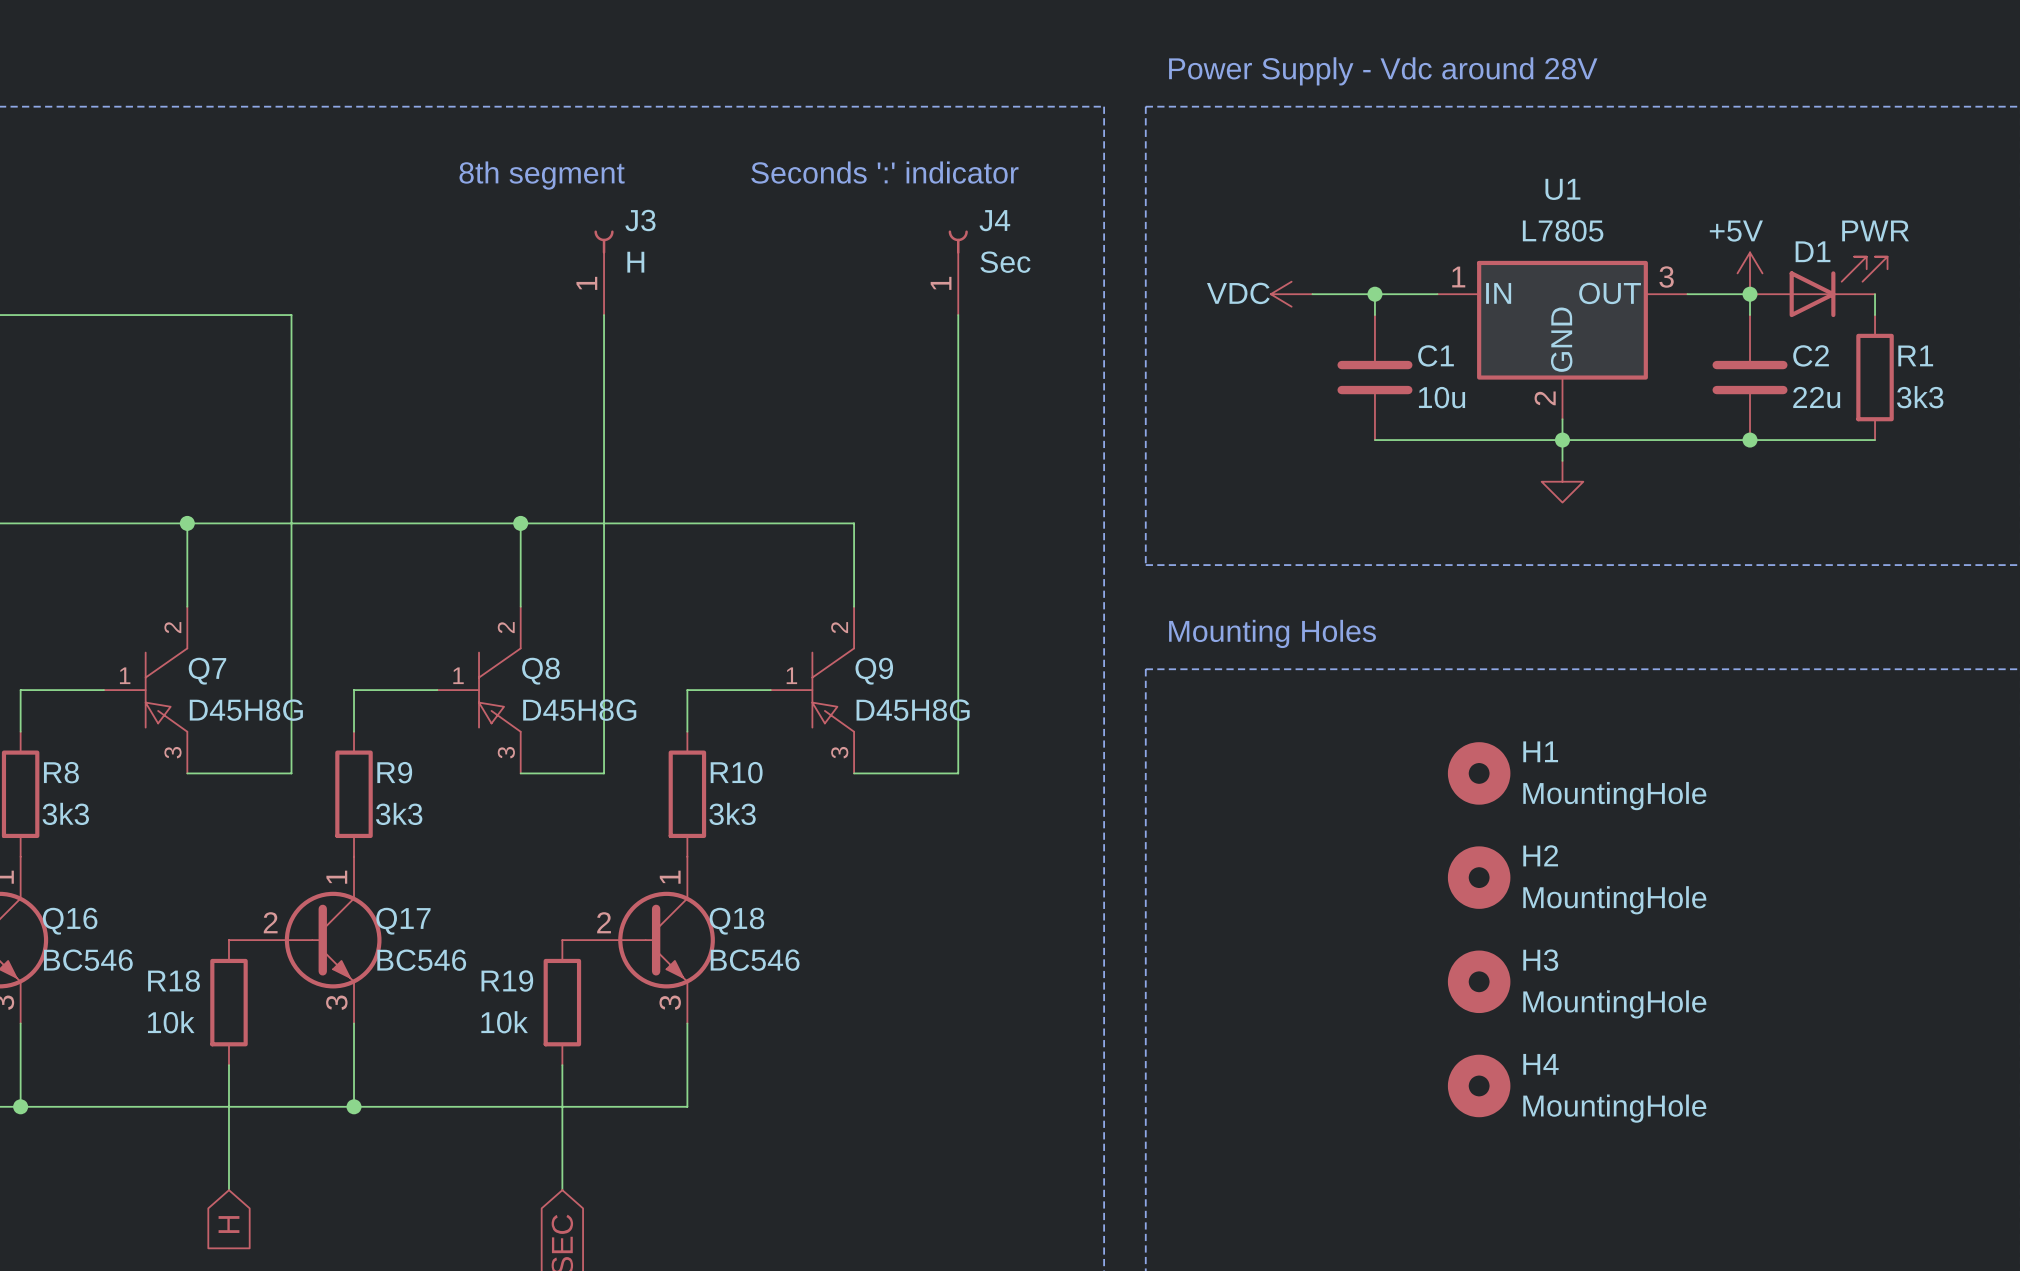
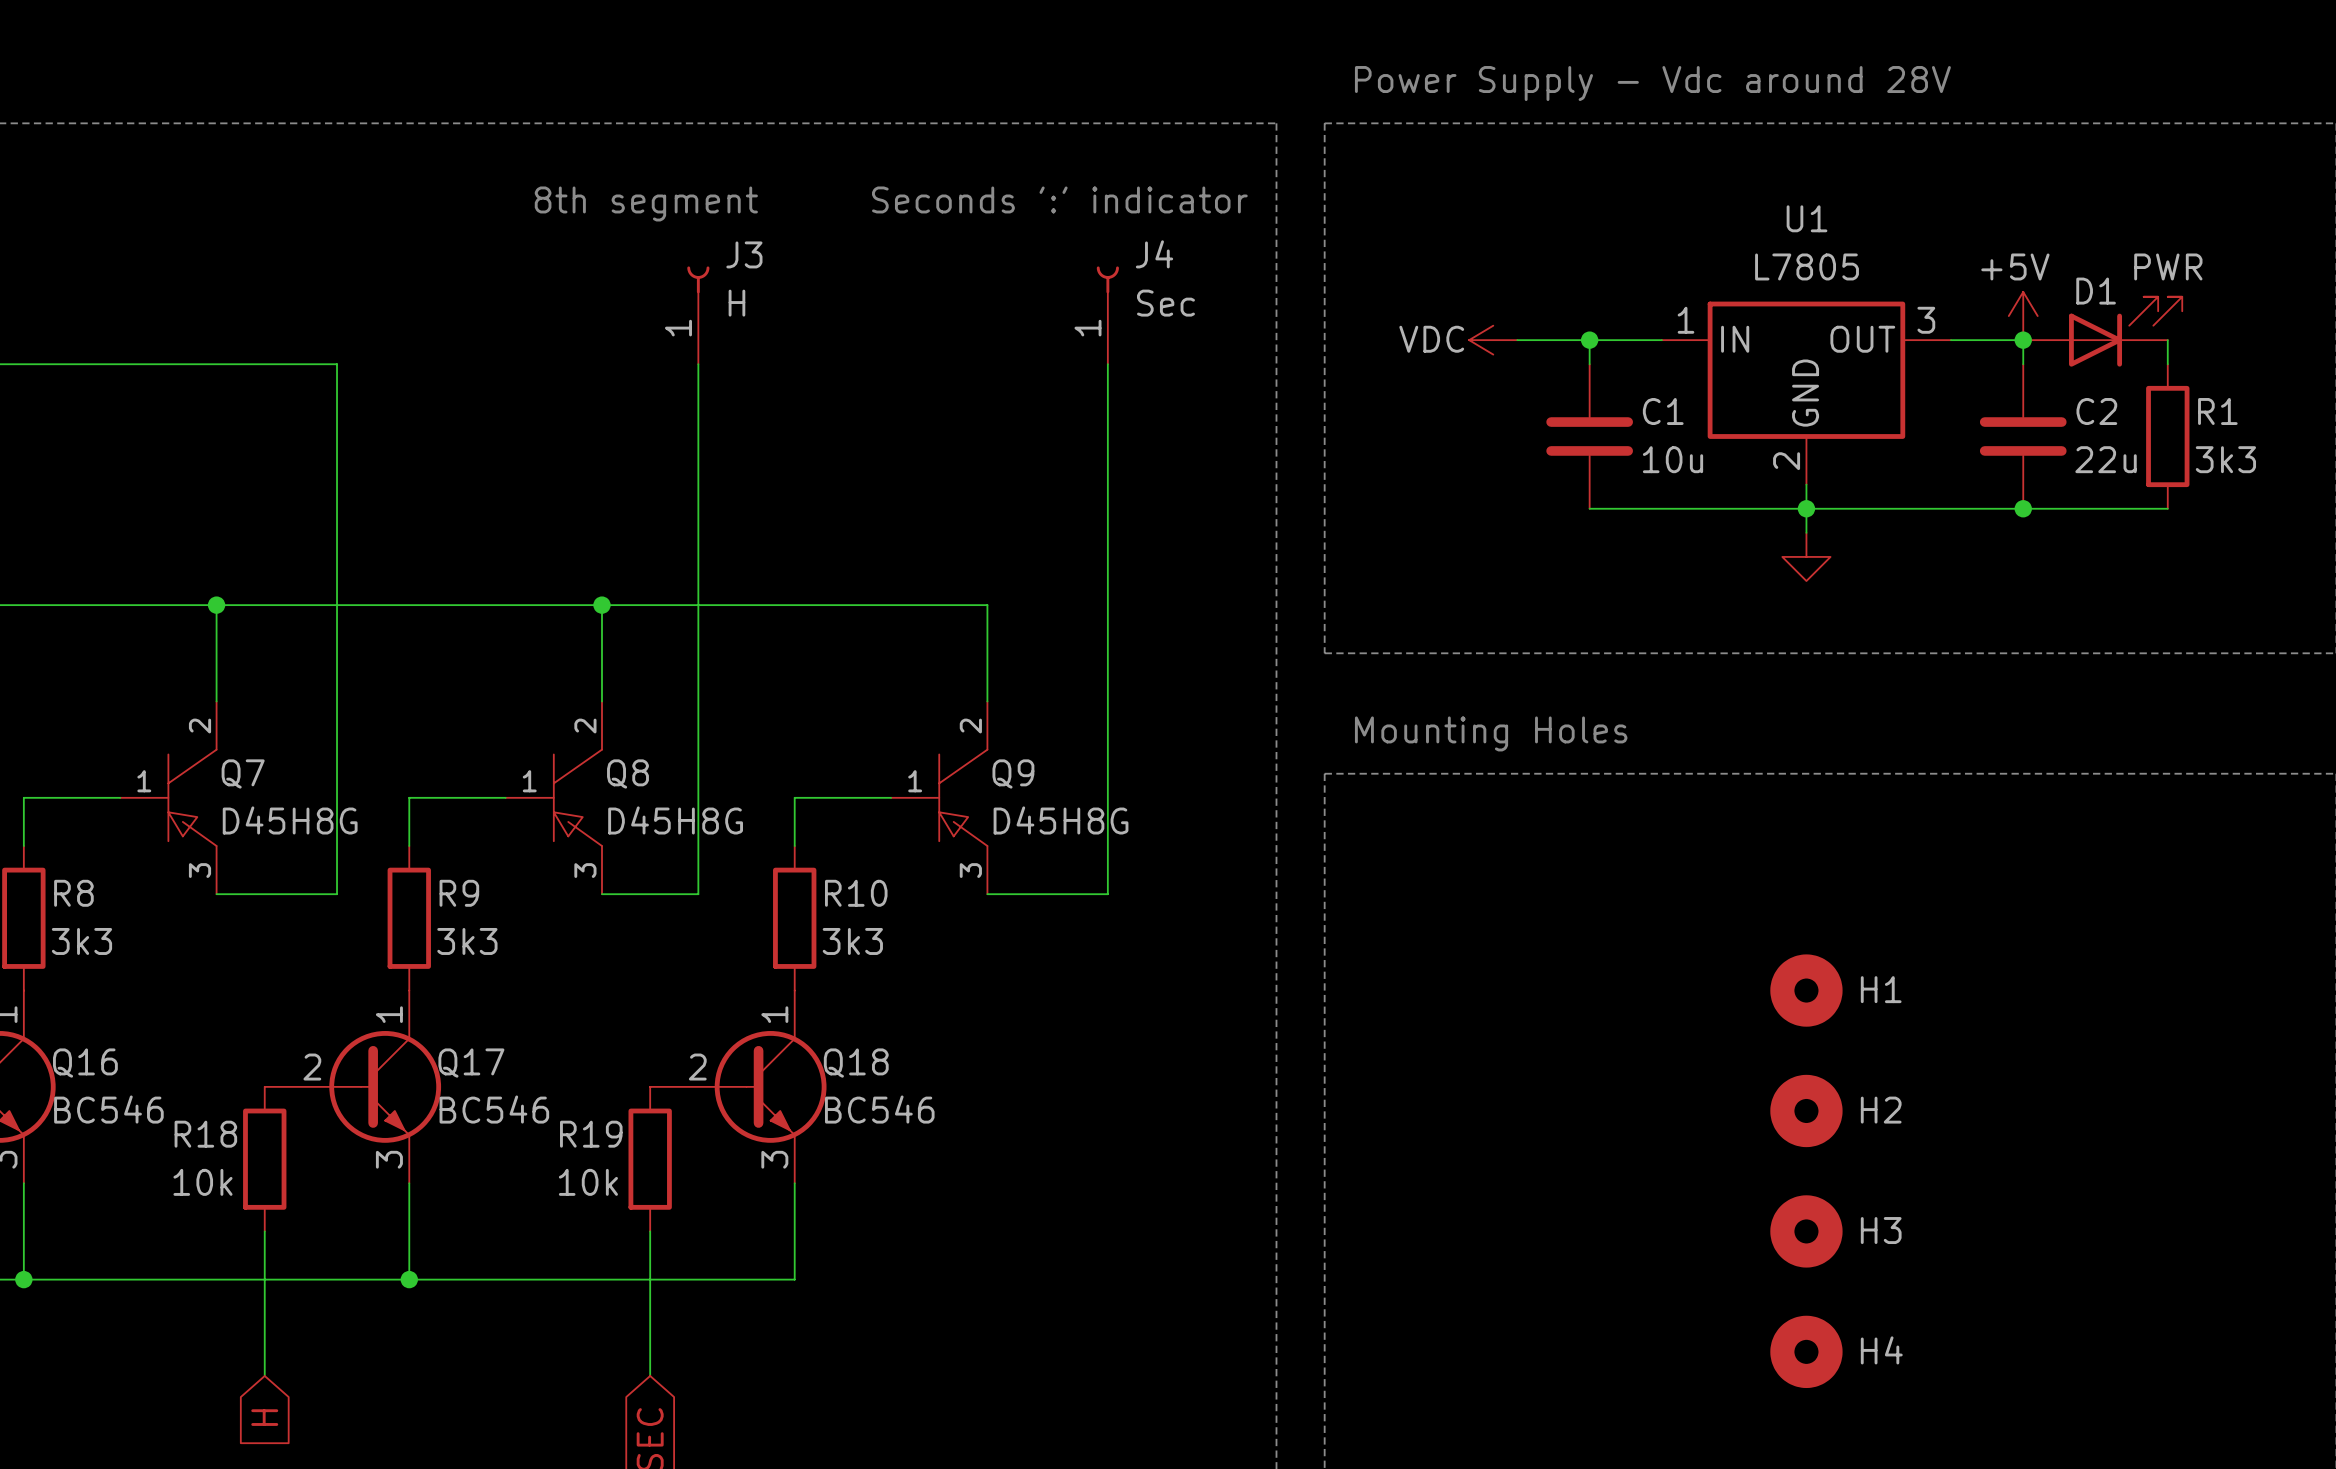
H1 name position: H1 (1540, 751) -> H1 (1881, 989)
H1 position: (1479, 773) -> (1806, 990)
H1 value: MountingHole (1614, 796) -> none
H2 name position: H2 (1540, 855) -> H2 (1881, 1110)
H2 position: (1479, 877) -> (1806, 1110)
H2 value: MountingHole (1614, 900) -> none
H3 name position: H3 (1540, 960) -> H3 (1881, 1230)
H3 position: (1479, 981) -> (1806, 1231)
H3 value: MountingHole (1614, 1004) -> none
H4 name position: H4 (1540, 1064) -> H4 (1881, 1350)
H4 position: (1479, 1085) -> (1806, 1351)
H4 value: MountingHole (1614, 1108) -> none

